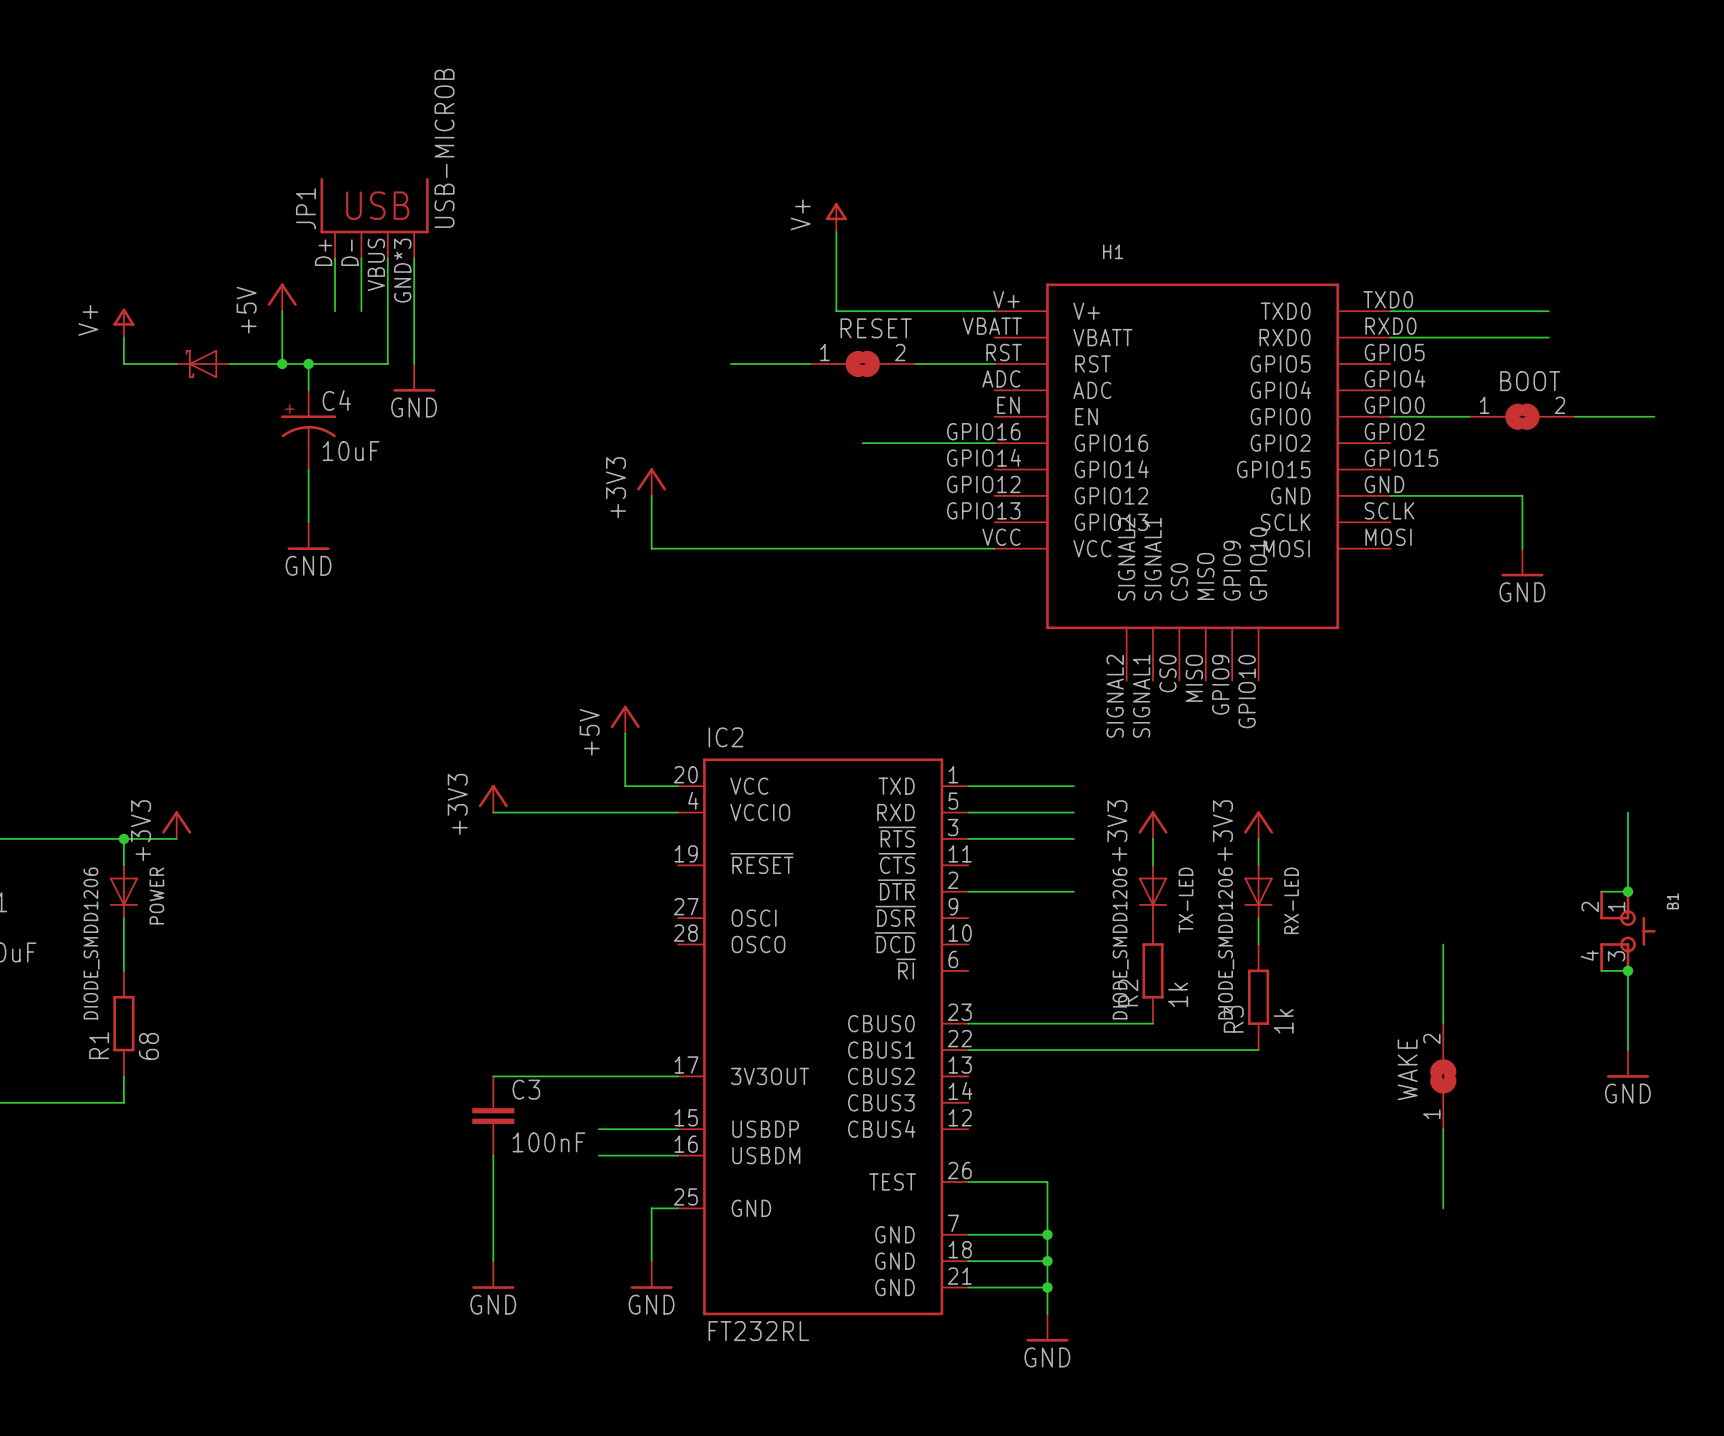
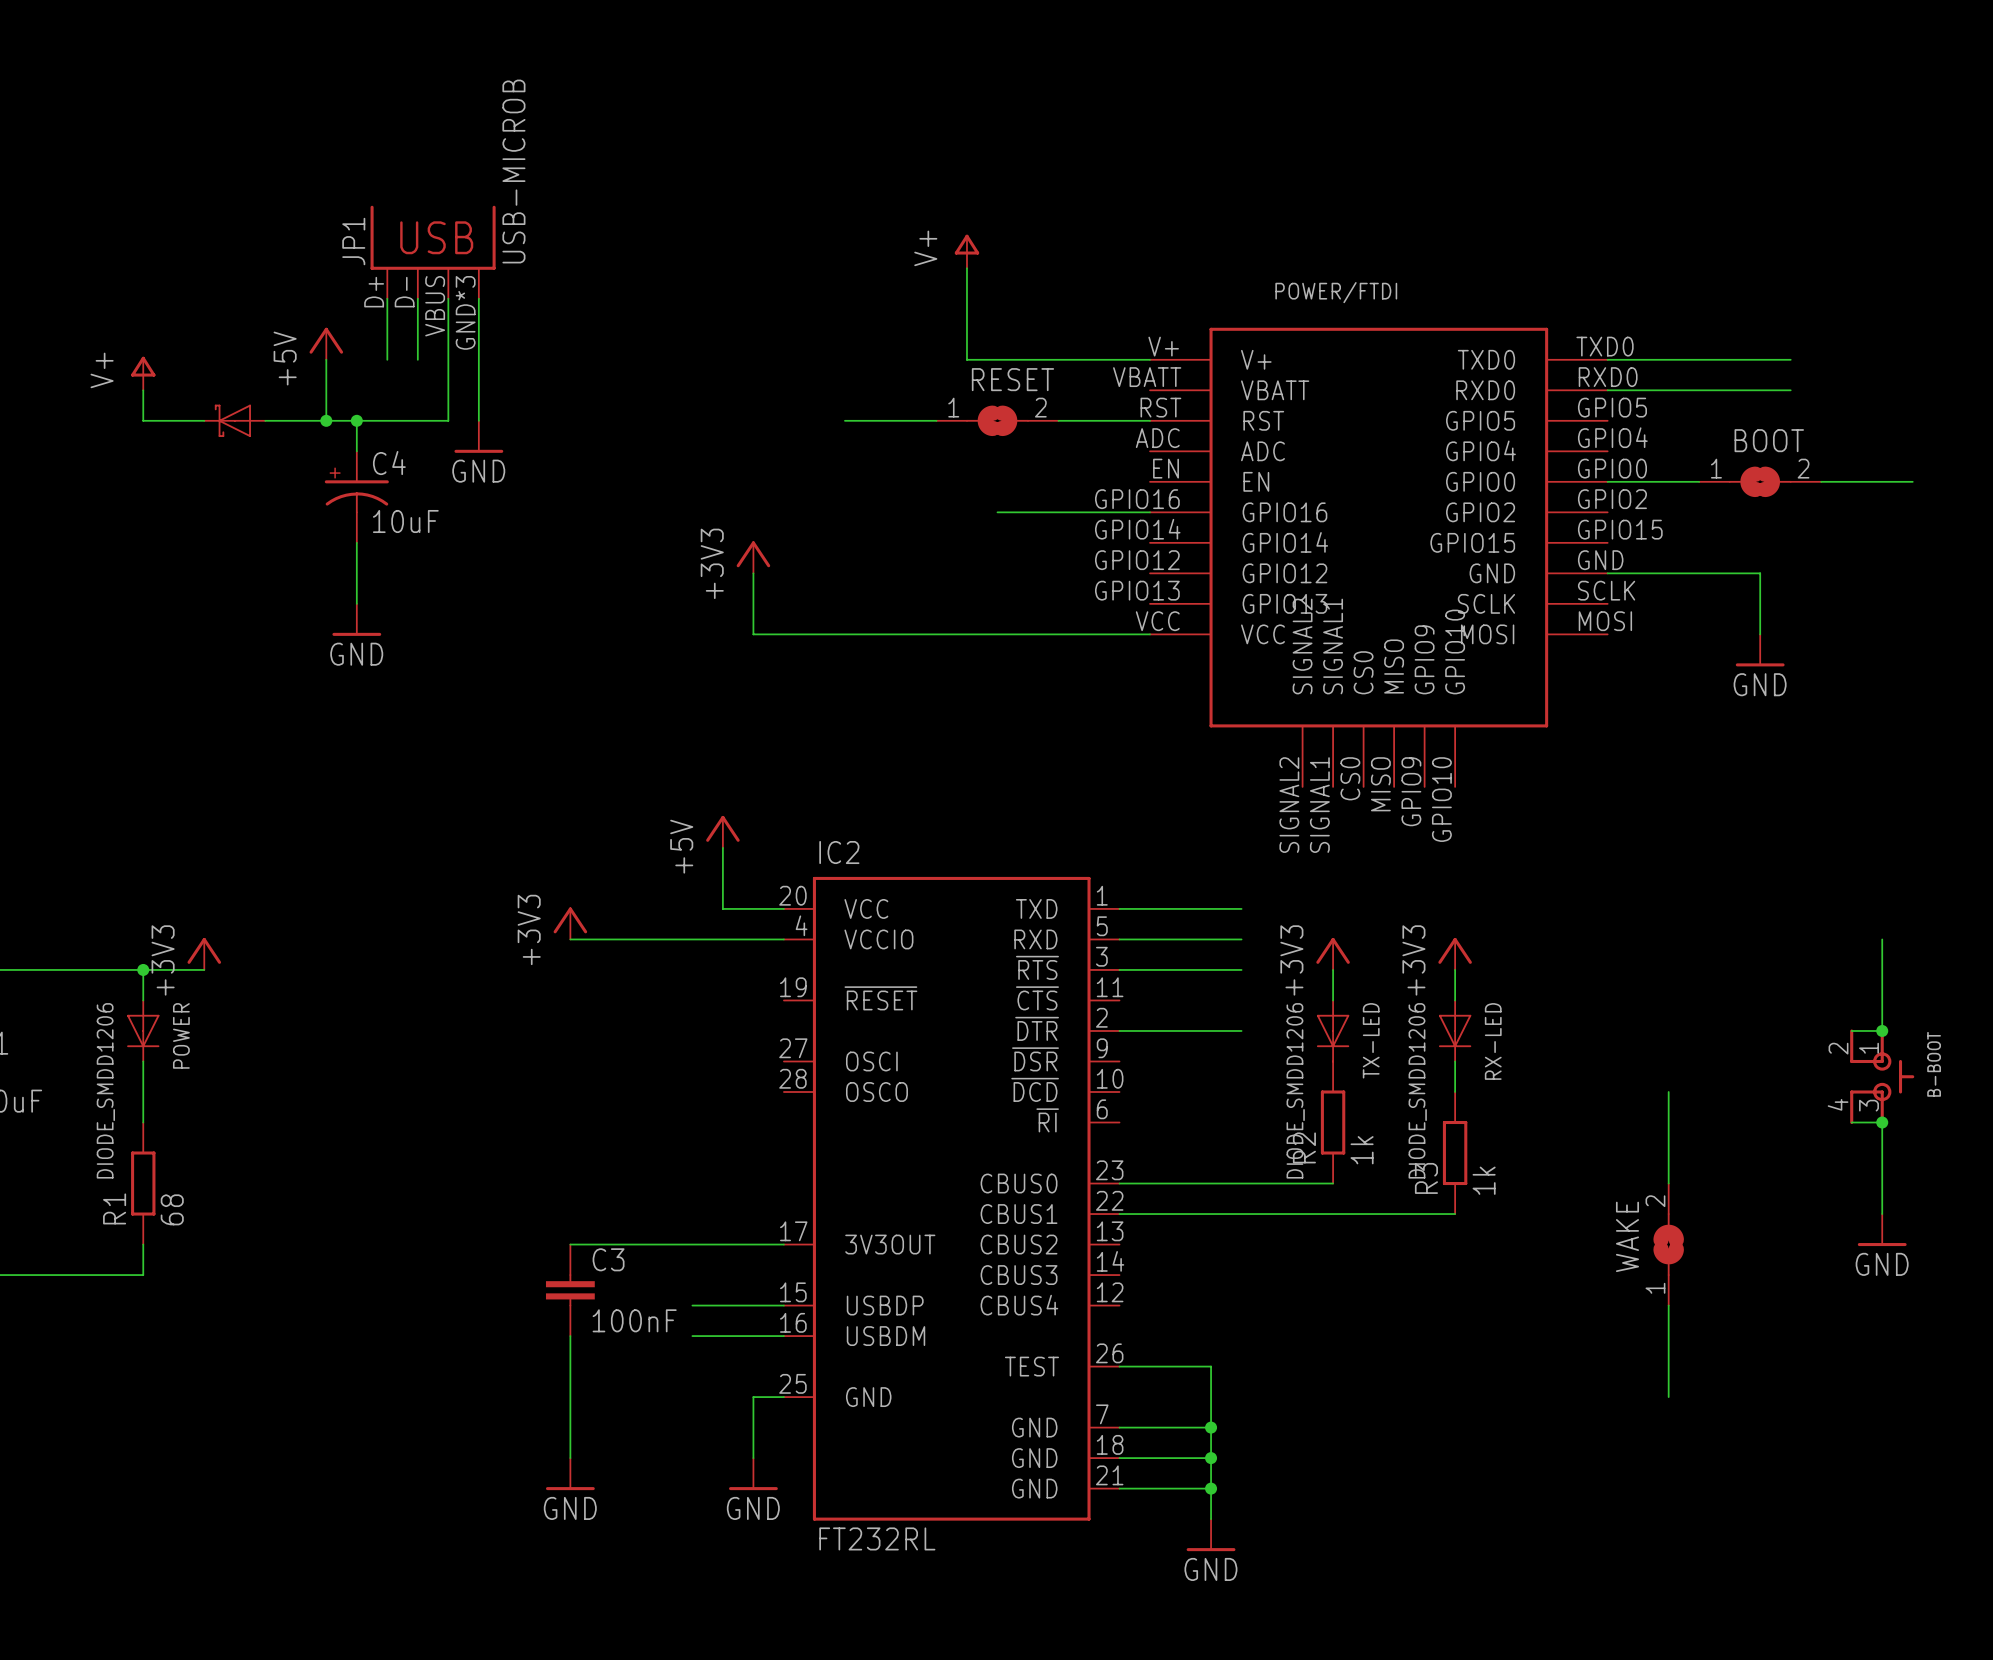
H1 name: H1 (1113, 251) -> POWER/FTDI (1336, 292)
B1 name: B1 (1672, 901) -> B-BOOT (1934, 1064)

